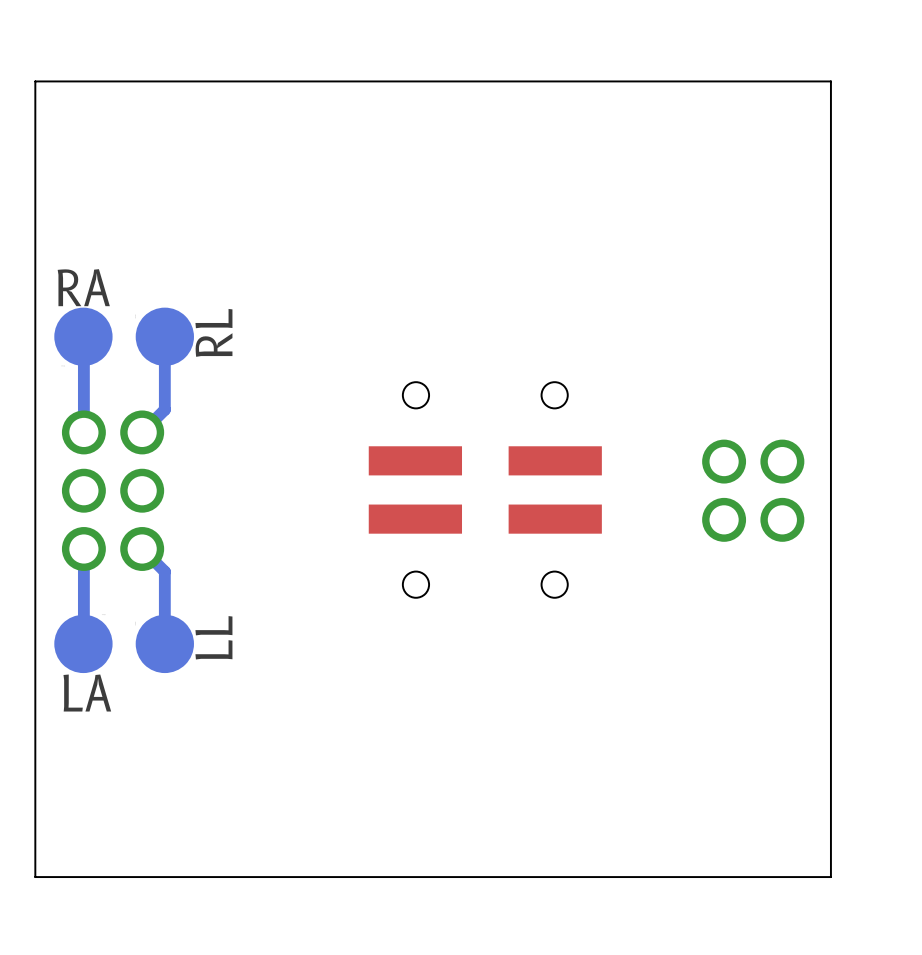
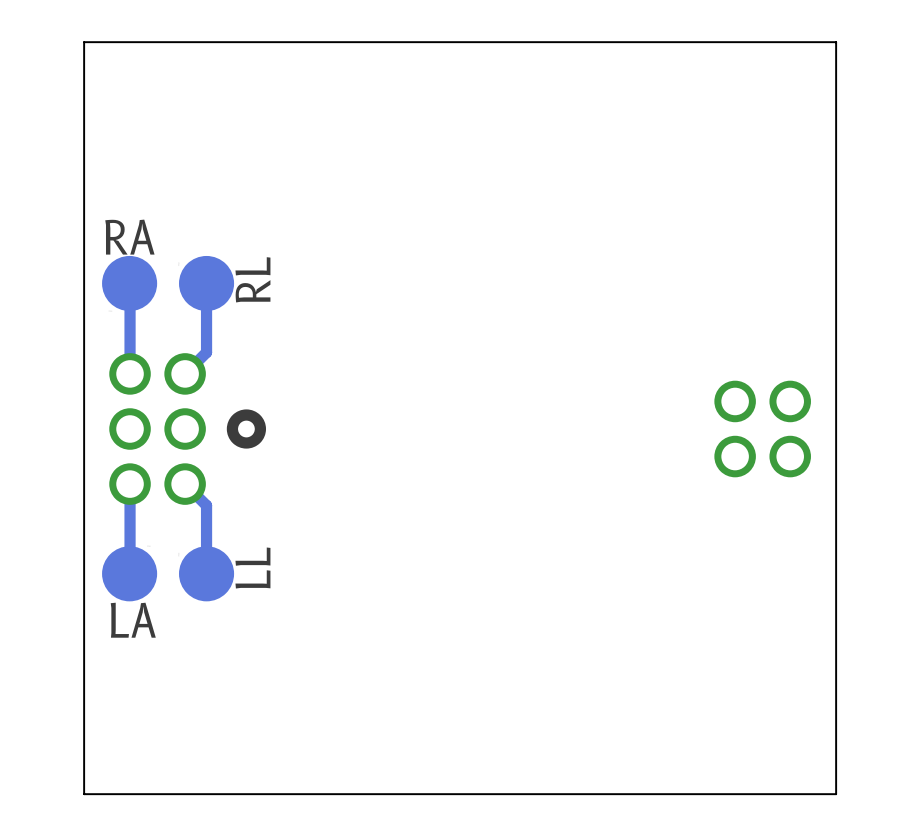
drawing: none -> [226, 409, 267, 449]
part: (485, 489) -> none

